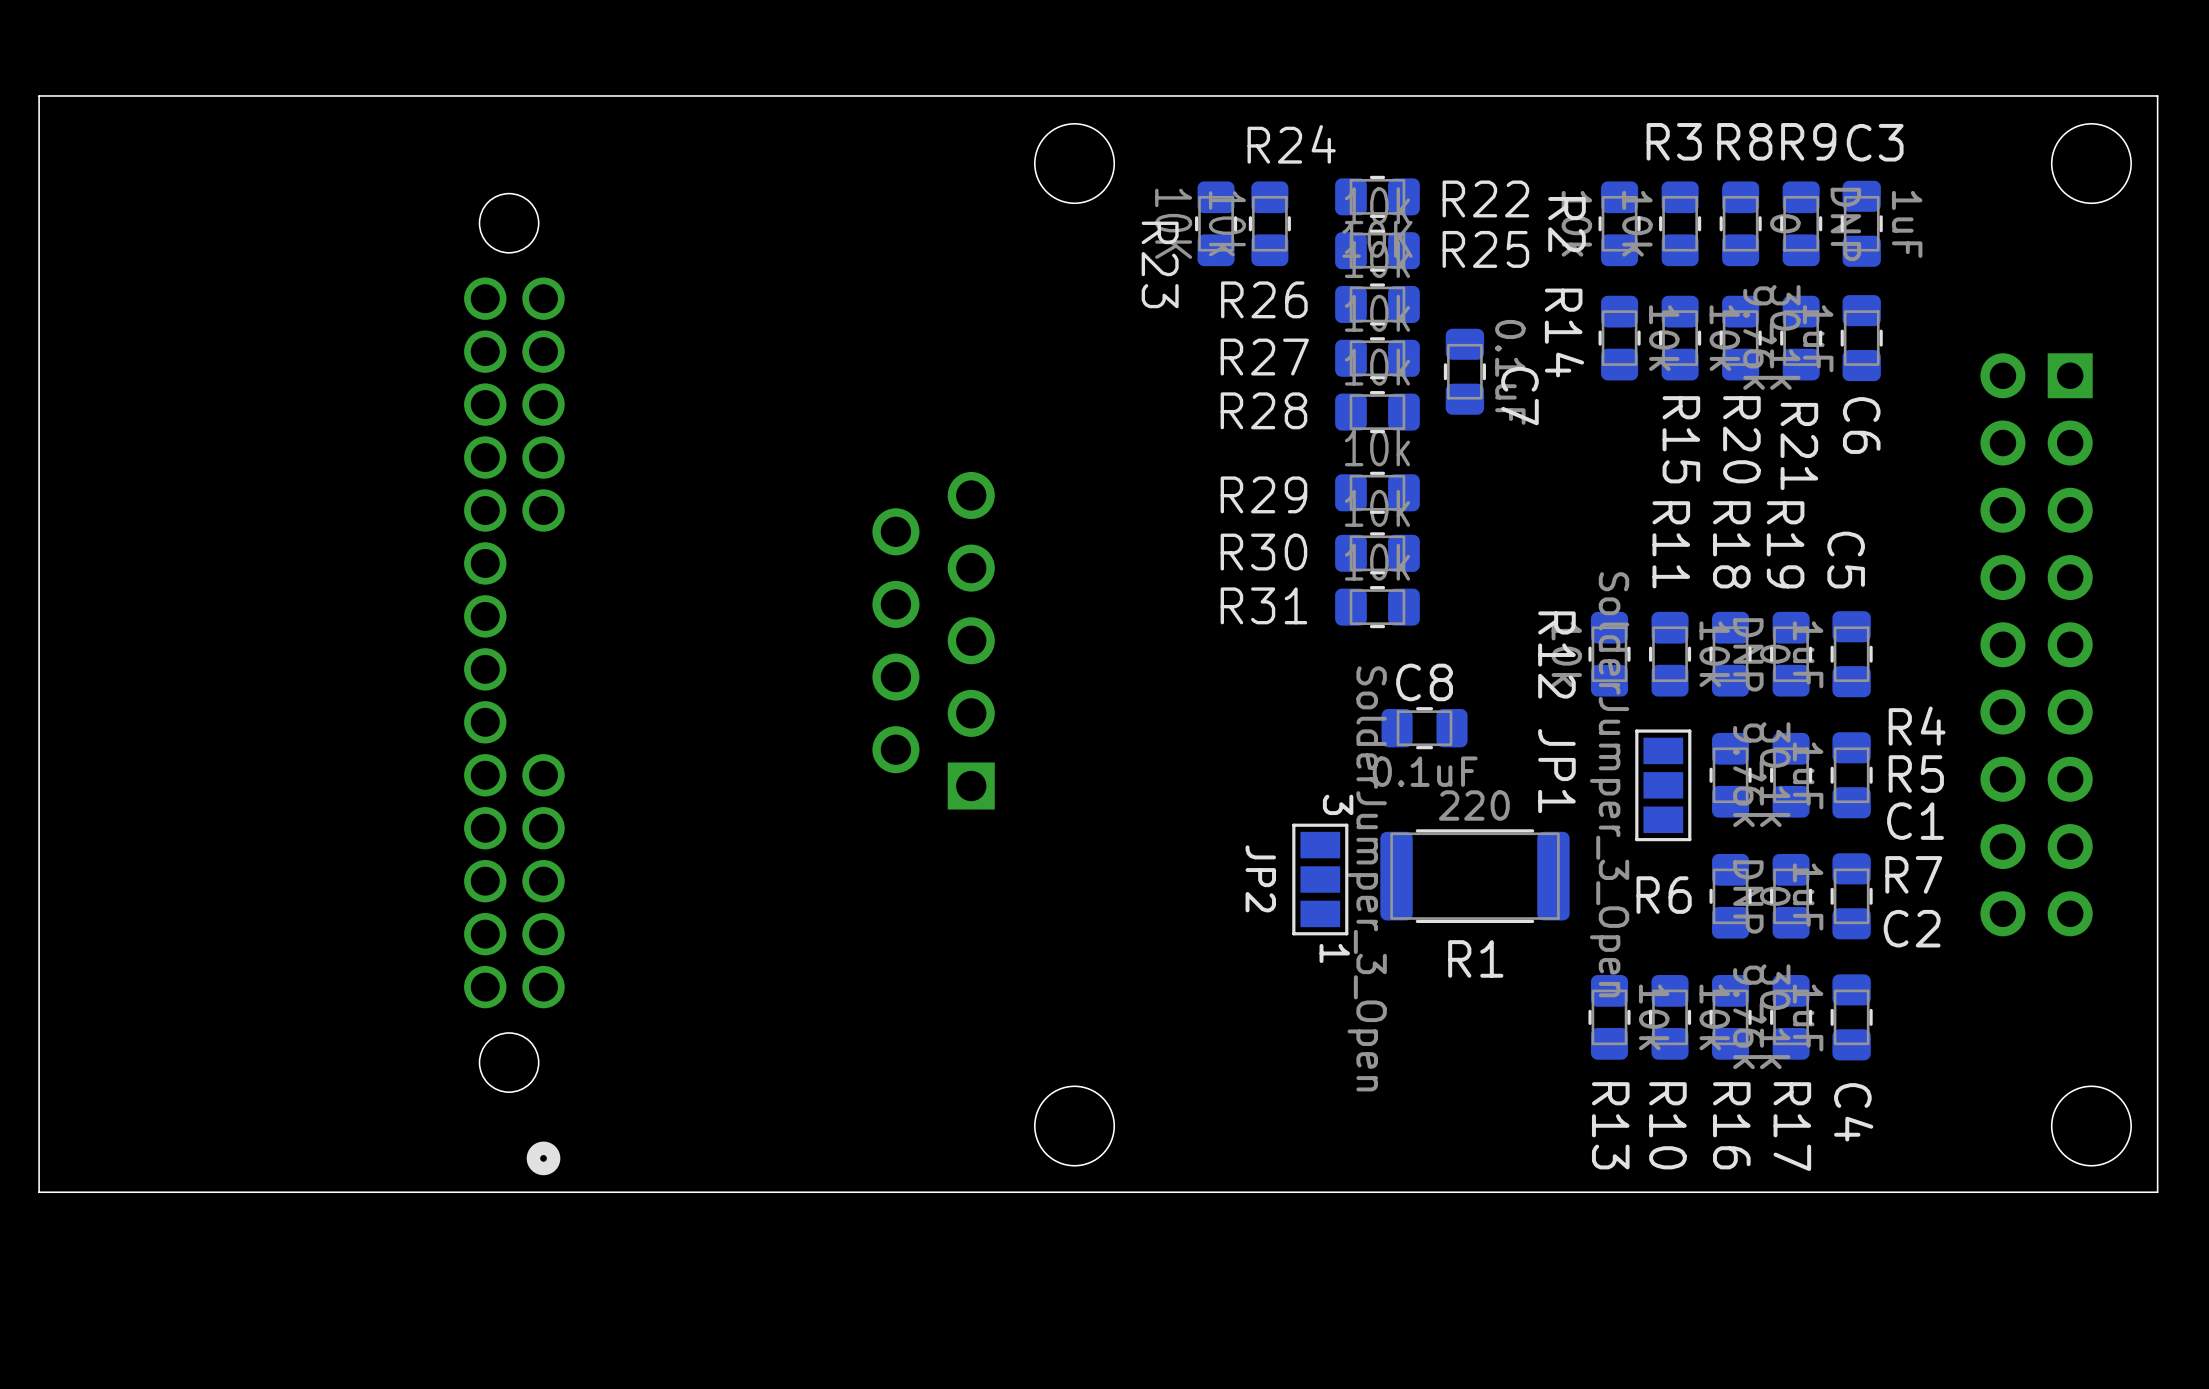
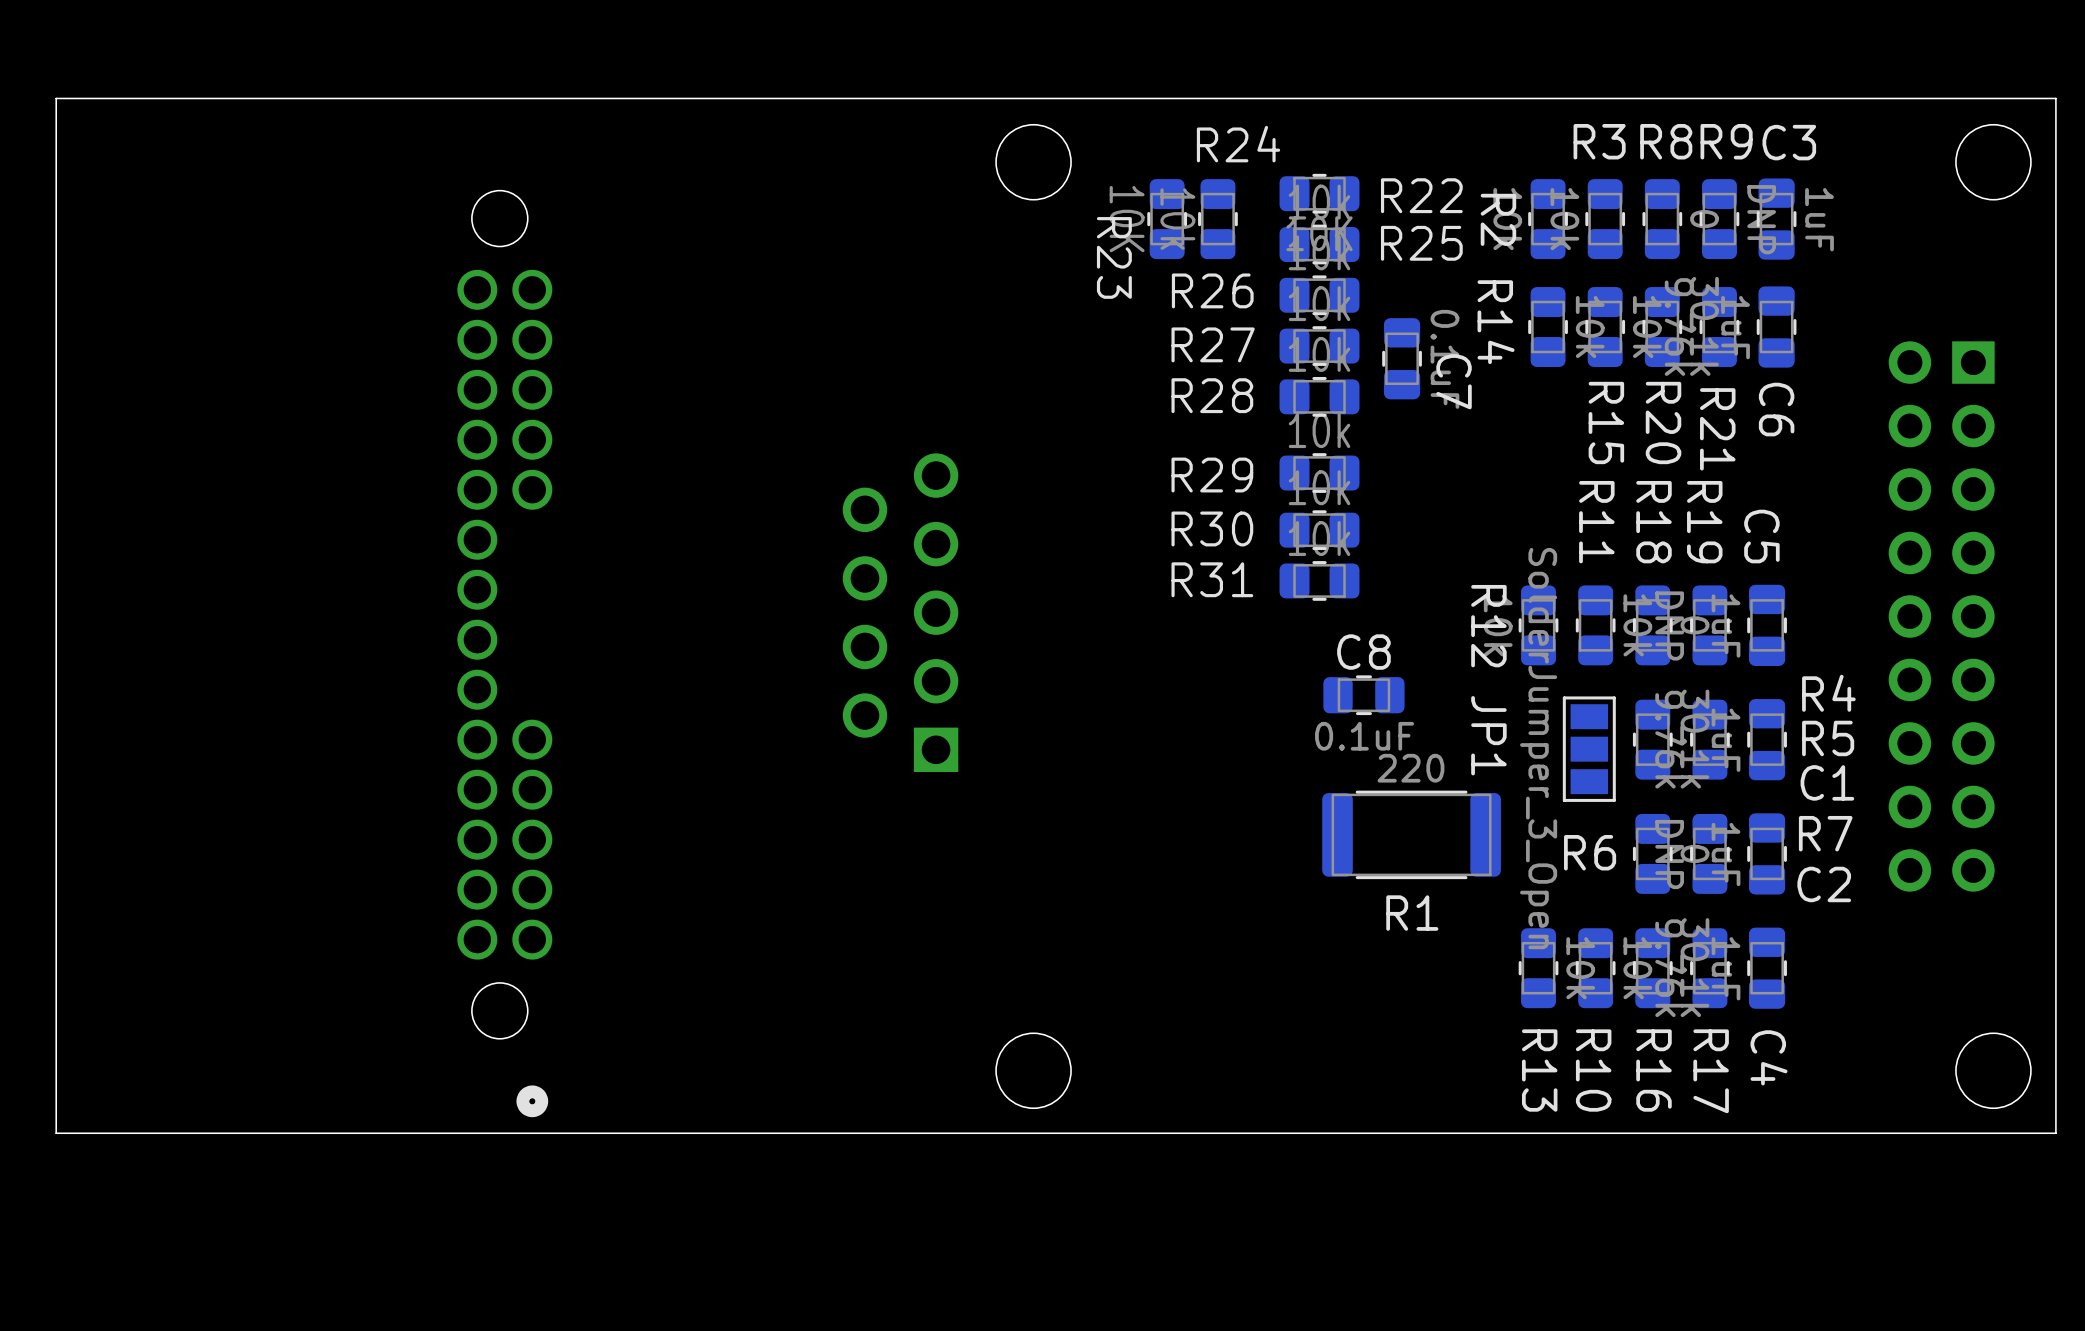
JP2: SolderJumper_3_Open (1320, 879) -> none

